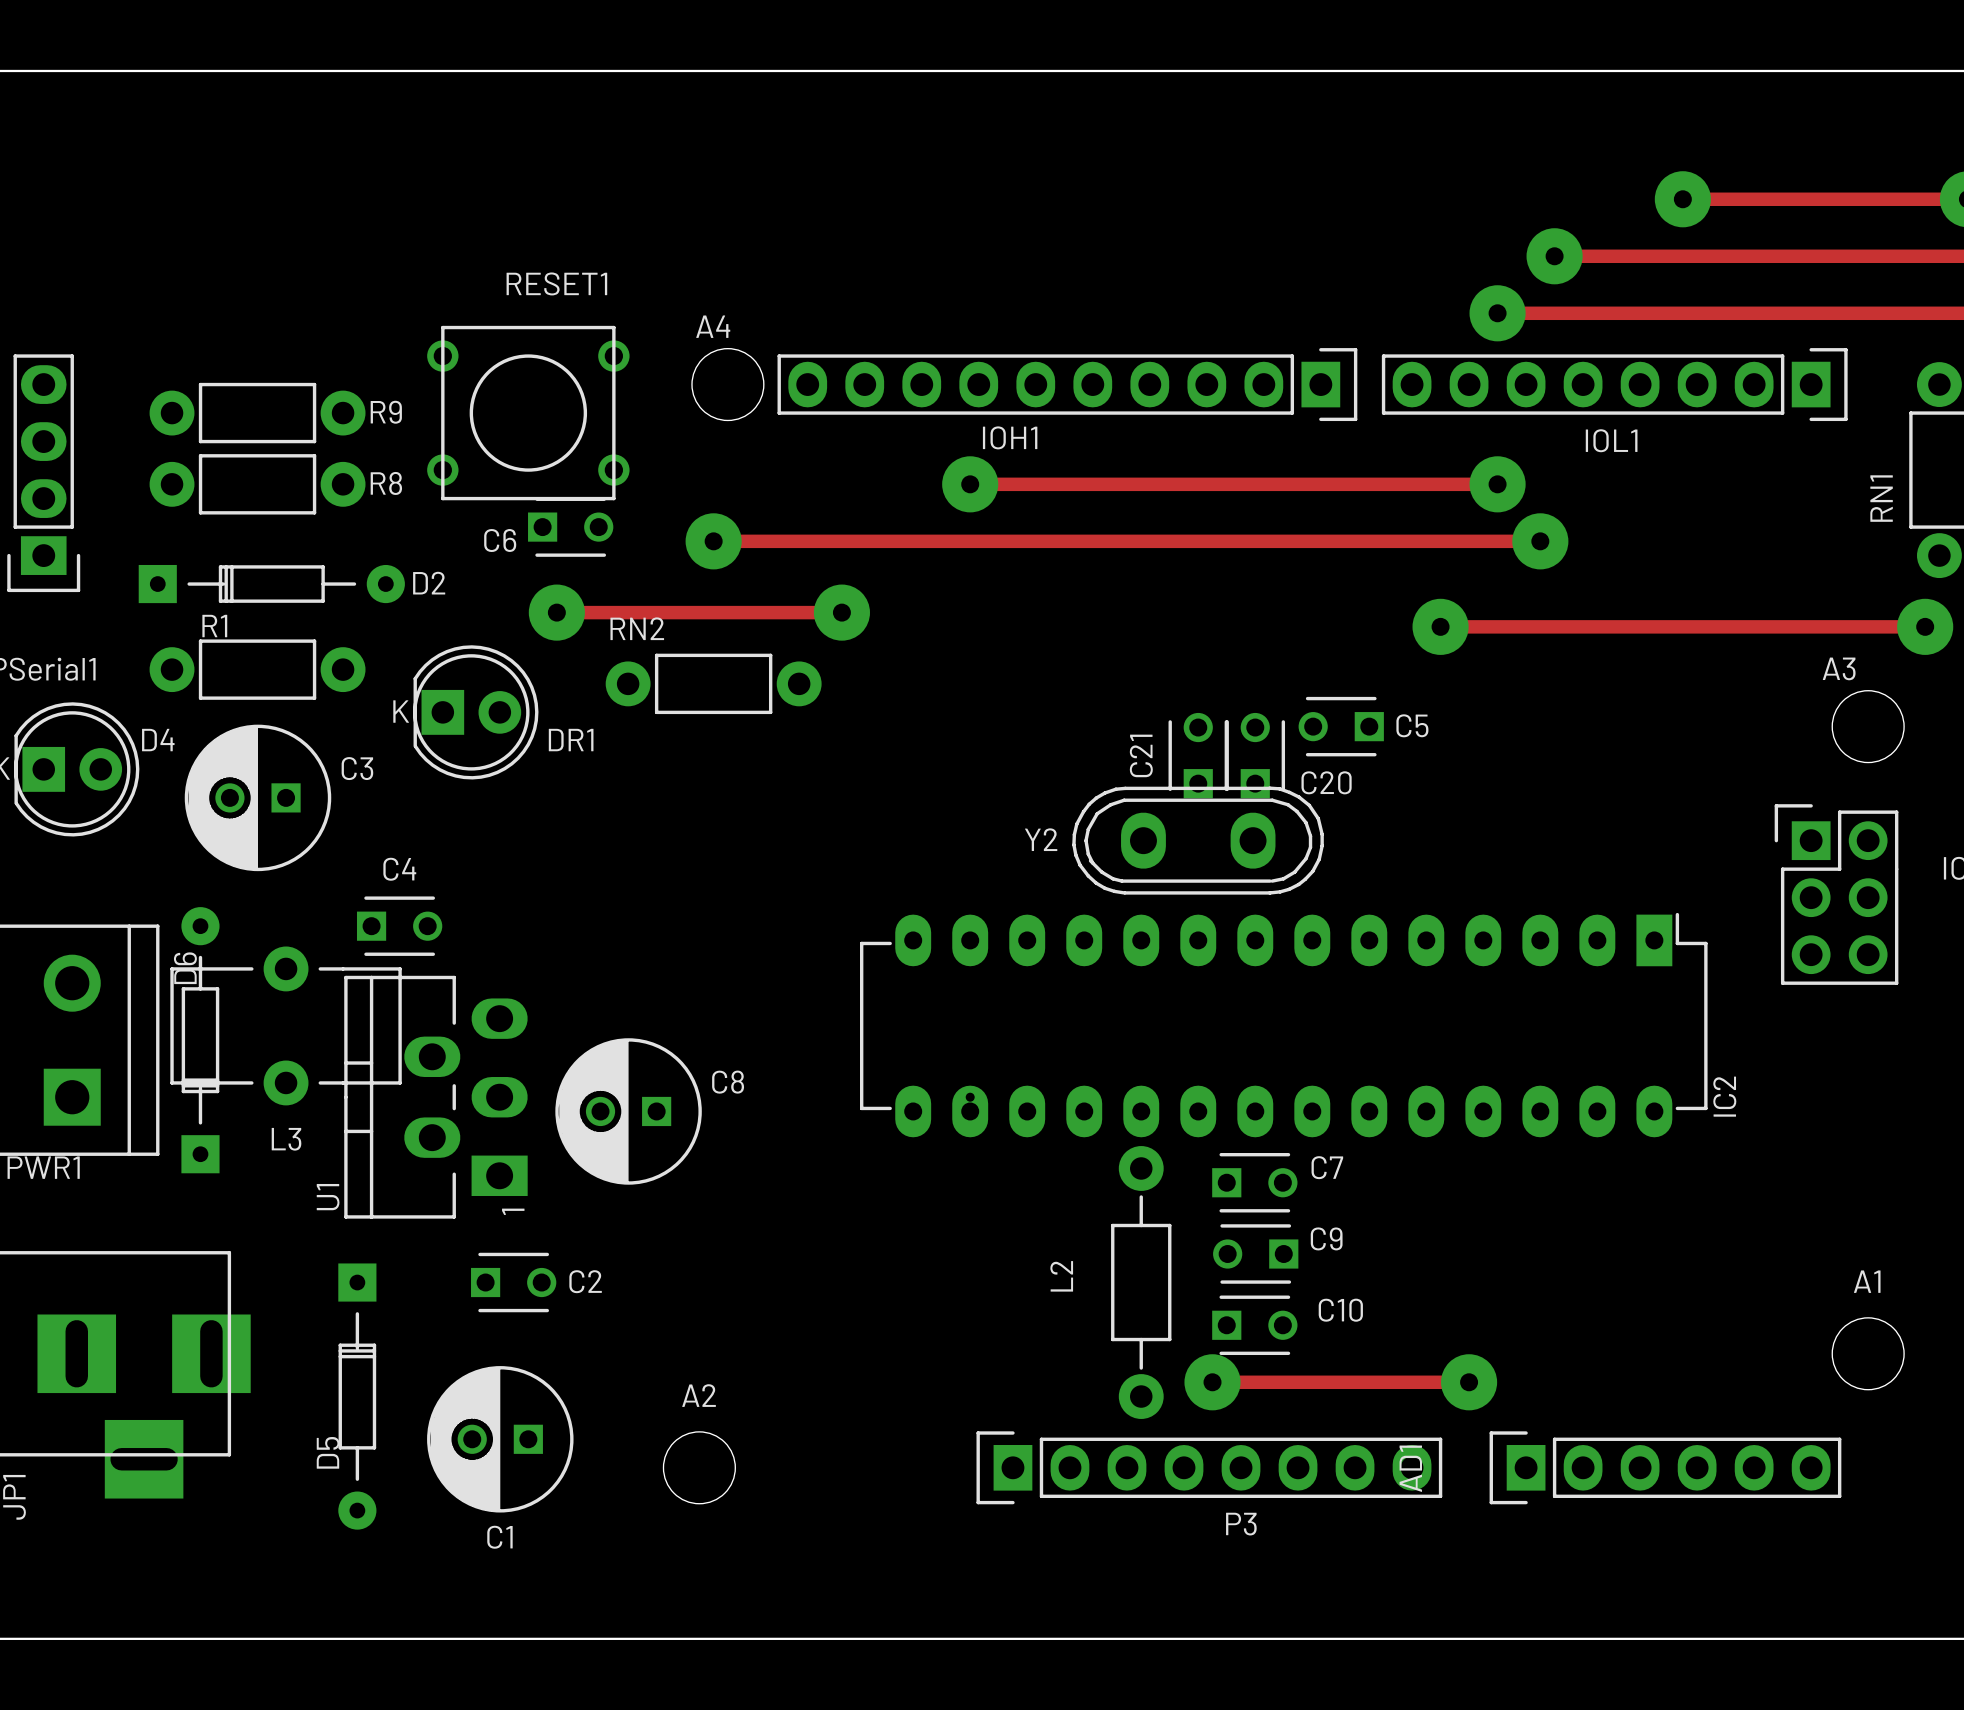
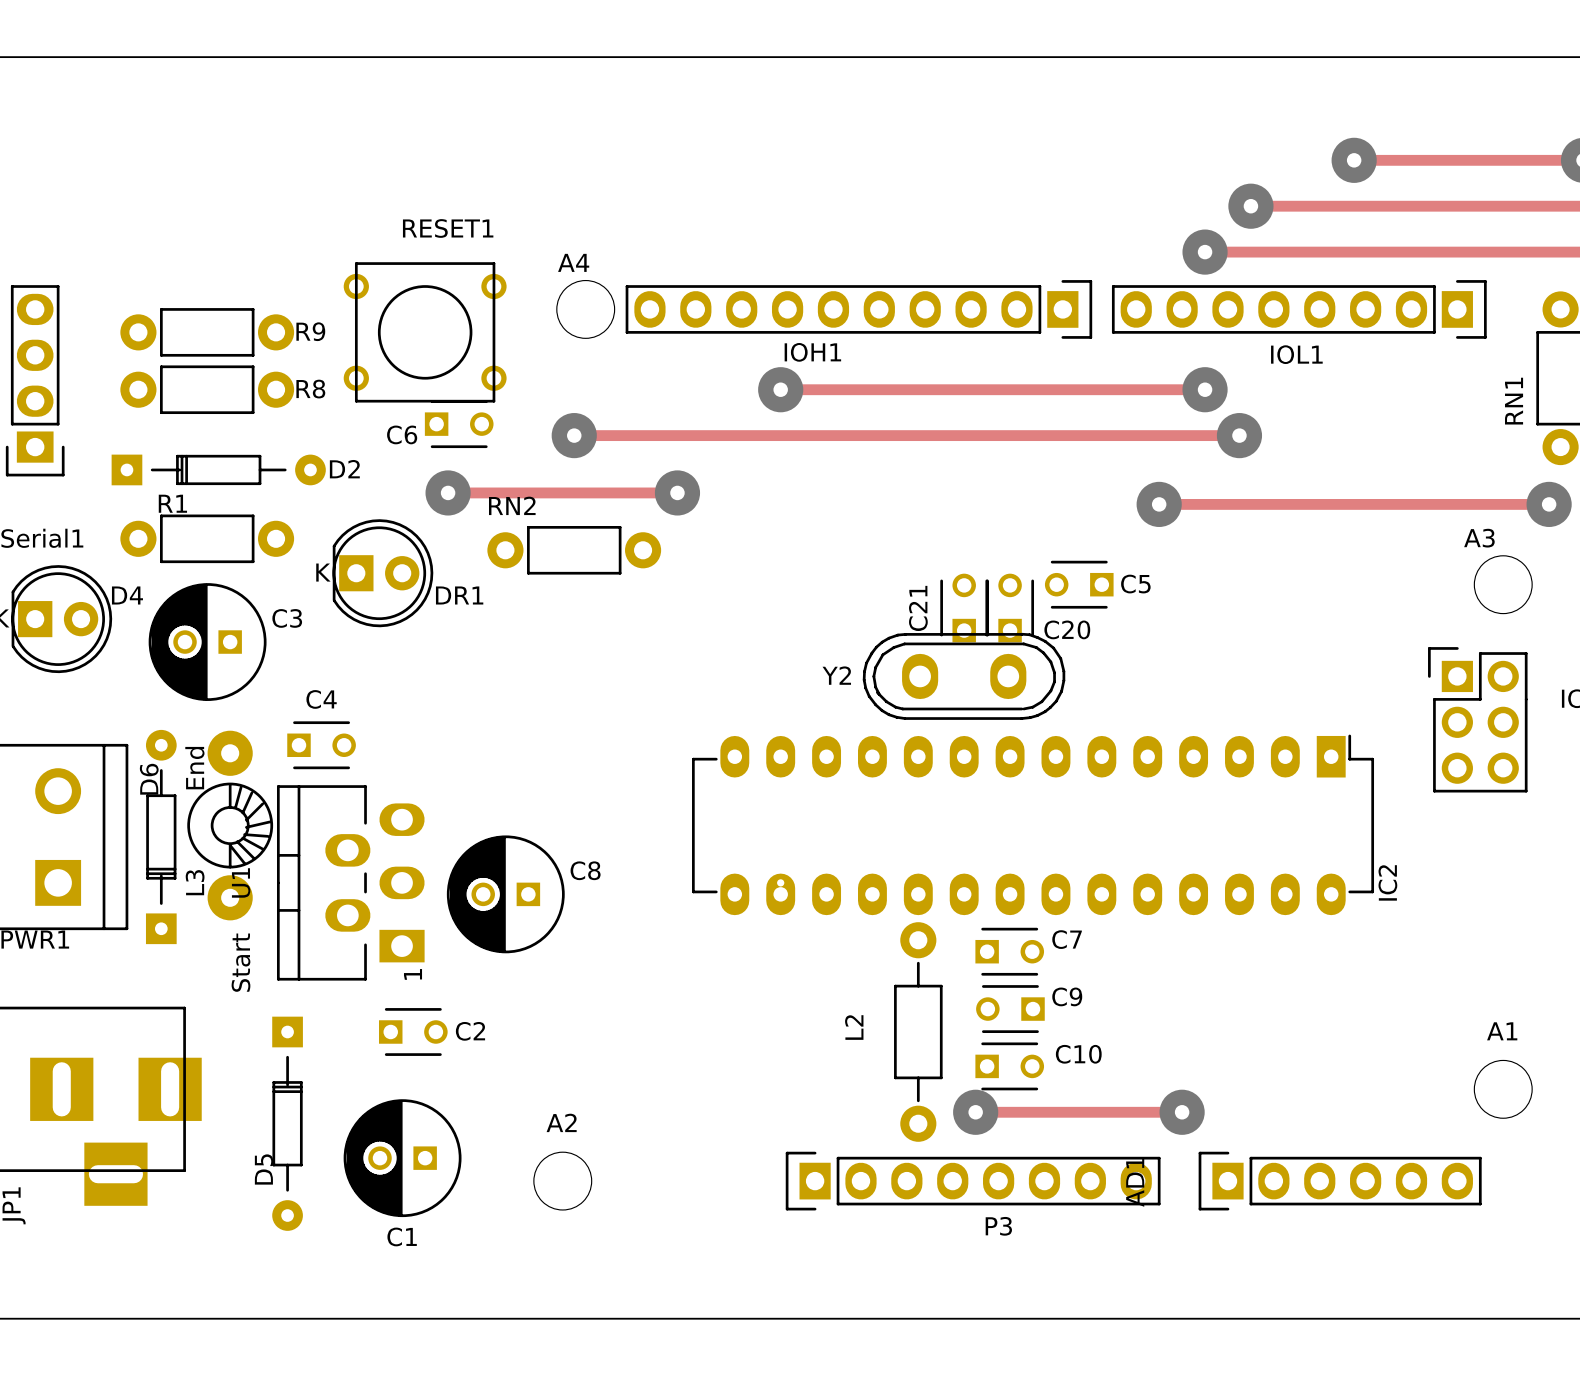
L3 footprint: [170, 946, 402, 1106] -> [187, 730, 274, 921]
L3 name position: L3 (286, 1139) -> L3 (195, 882)
U1 name position: U1 (328, 1197) -> U1 (241, 882)

